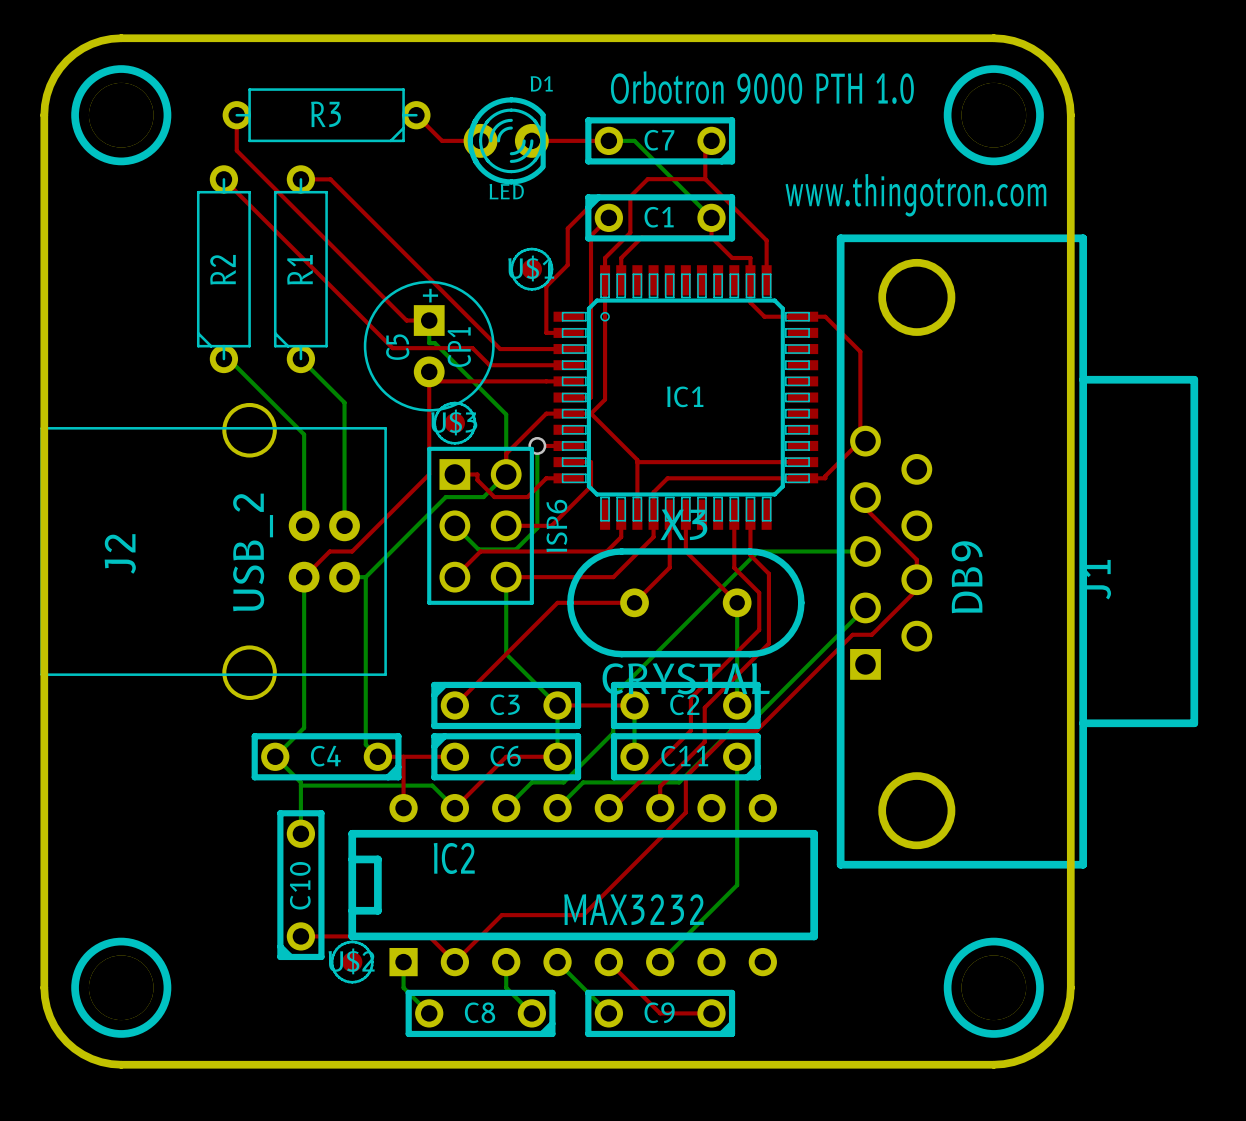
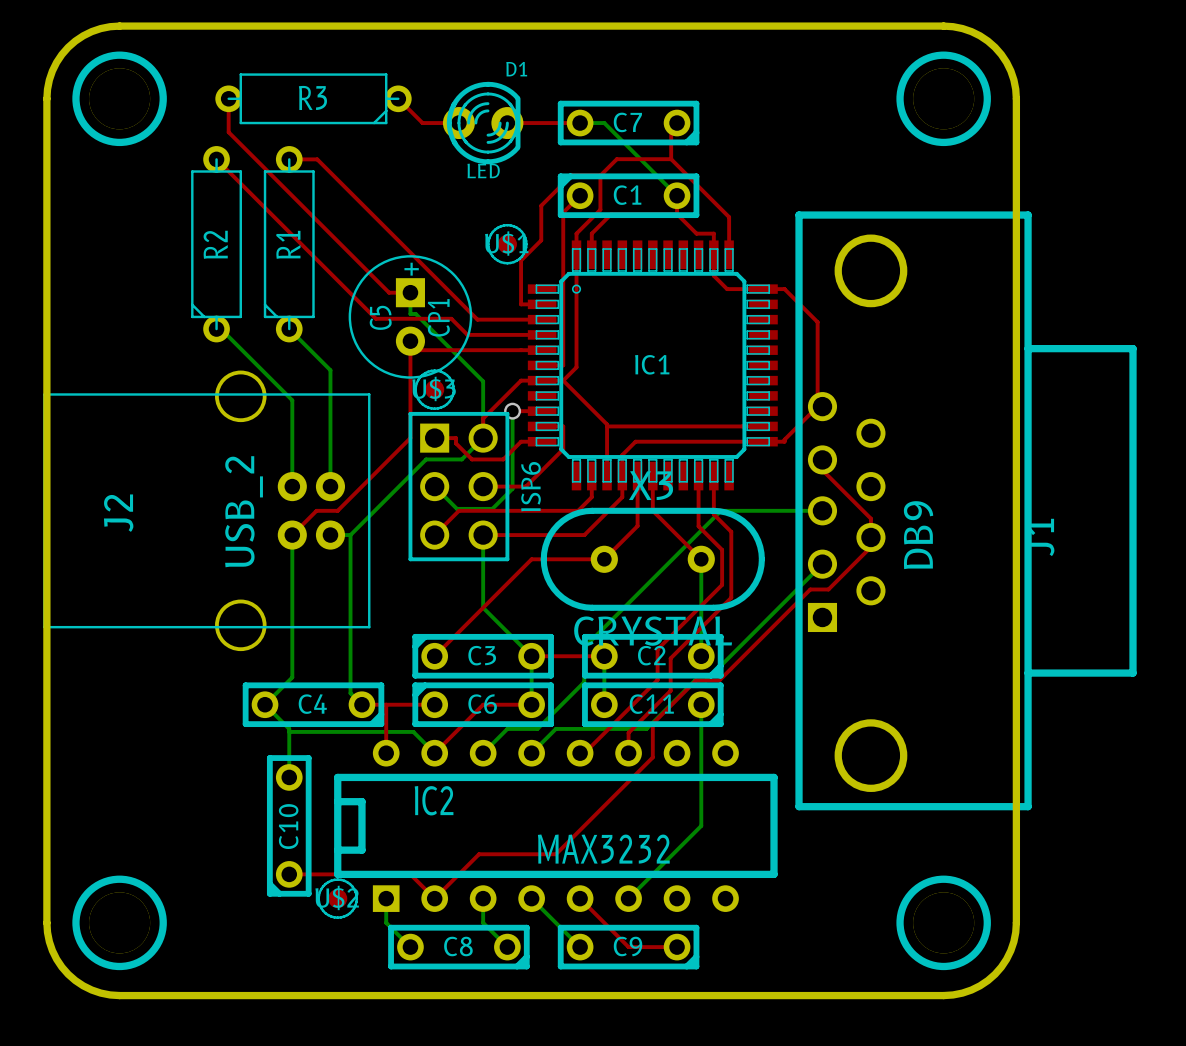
text: Orbotron 9000 PTH 1.0 (762, 87) -> none
text: www.thingotron.com (915, 195) -> none

